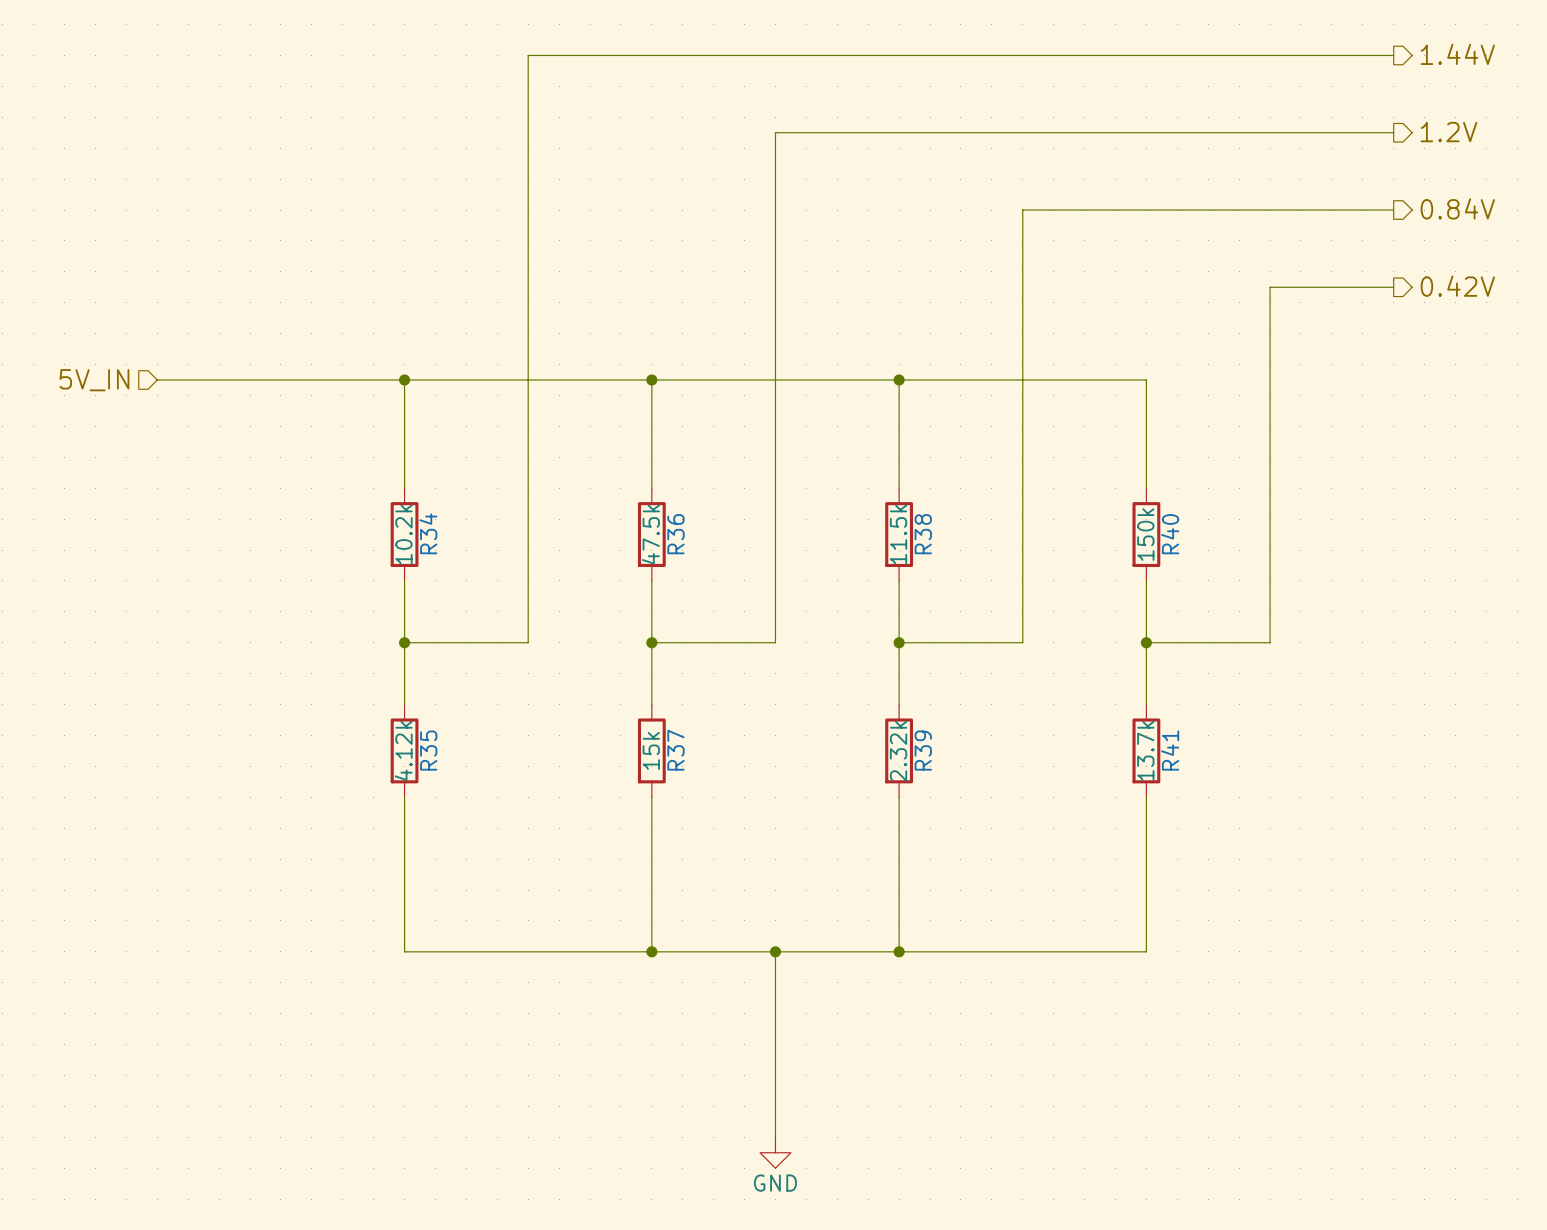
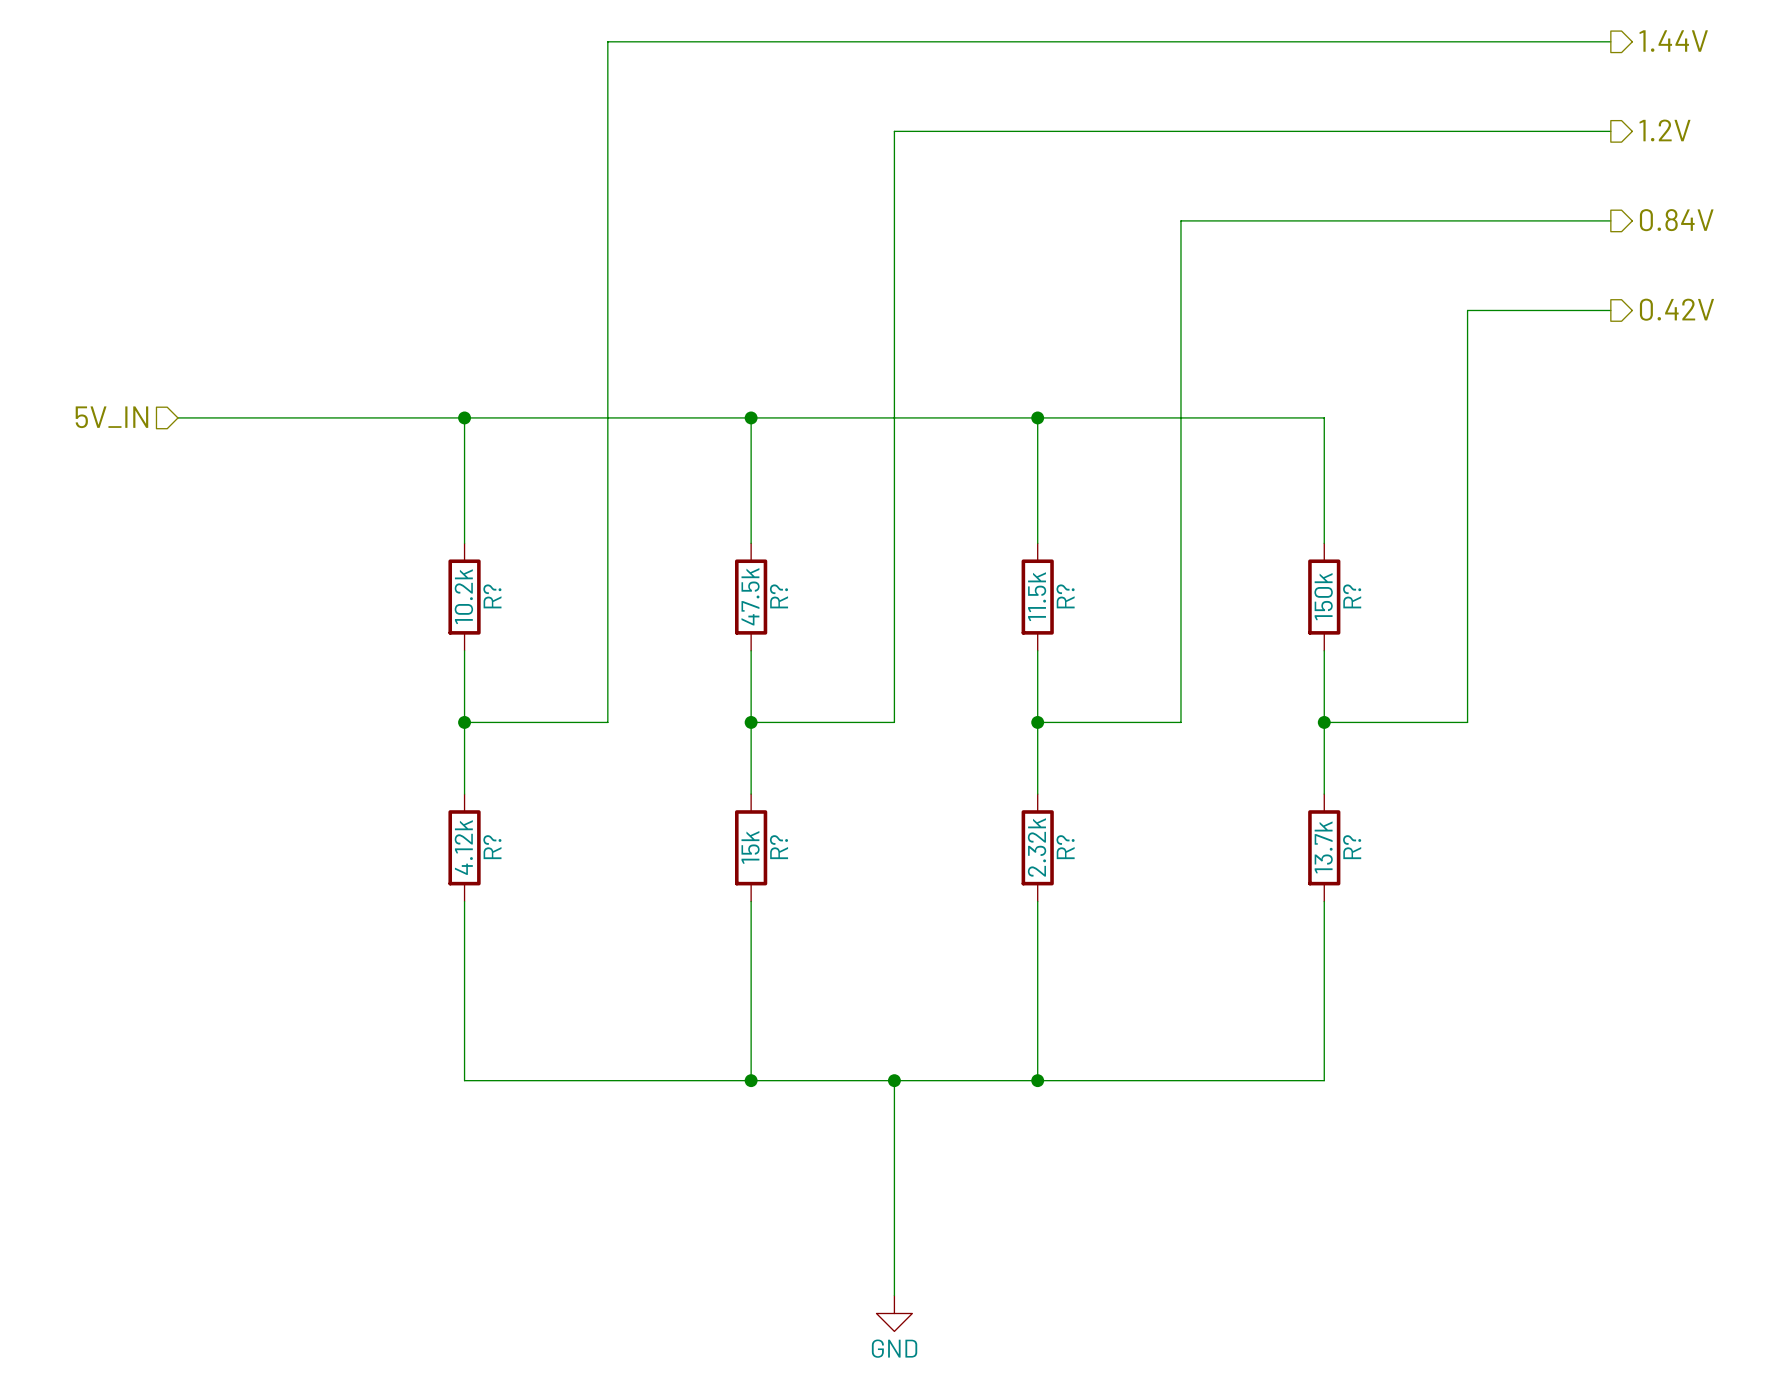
R34 name: R34 (428, 533) -> R? (492, 596)
R36 name: R36 (675, 534) -> R? (778, 596)
R38 name: R38 (923, 534) -> R? (1065, 596)
R40 name: R40 (1170, 534) -> R? (1352, 596)
R35 name: R35 (428, 750) -> R? (492, 847)
R37 name: R37 (675, 750) -> R? (778, 847)
R39 name: R39 (923, 750) -> R? (1065, 847)
R41 name: R41 (1170, 750) -> R? (1352, 847)

